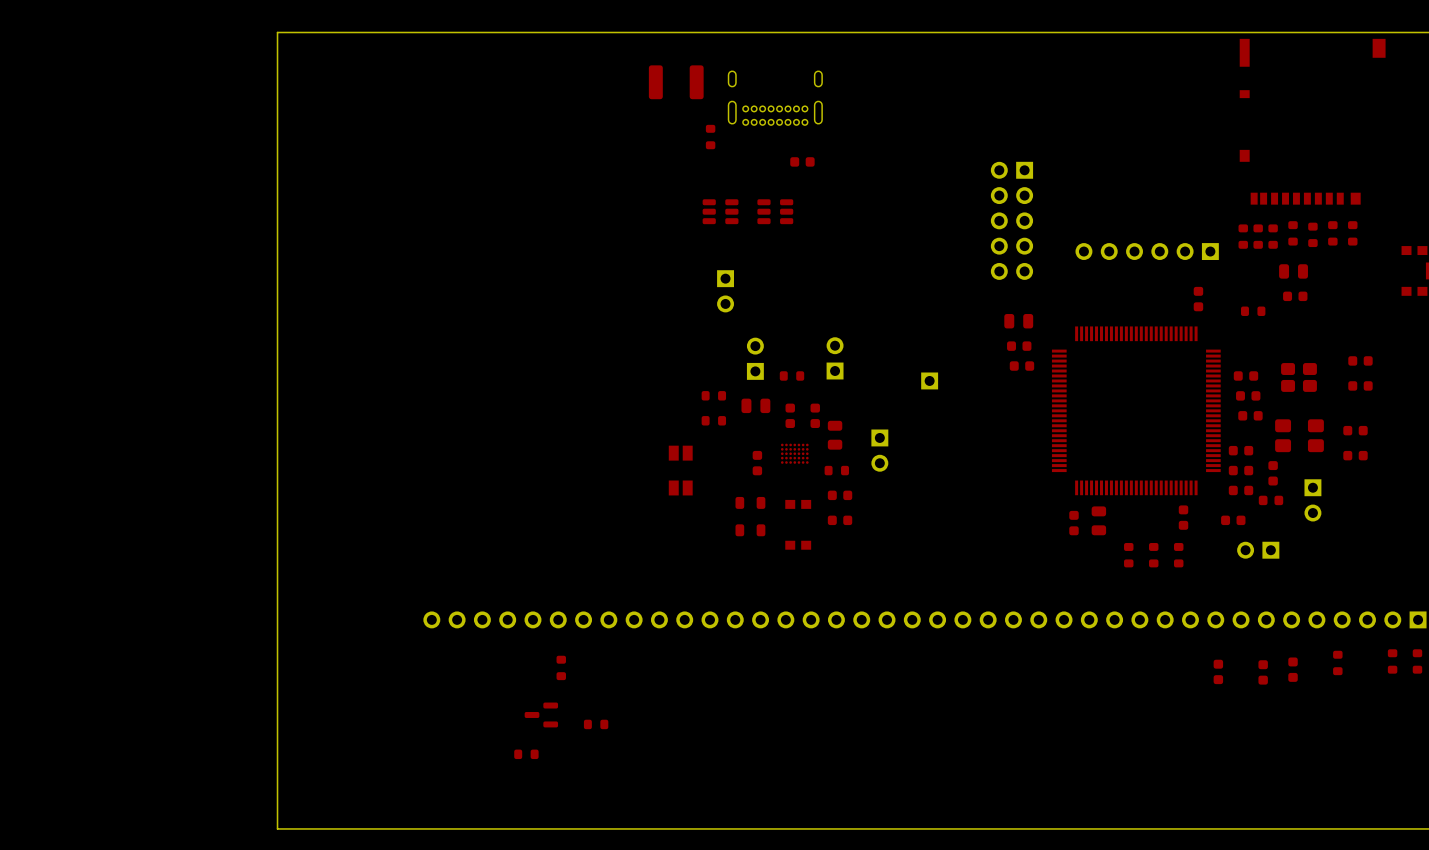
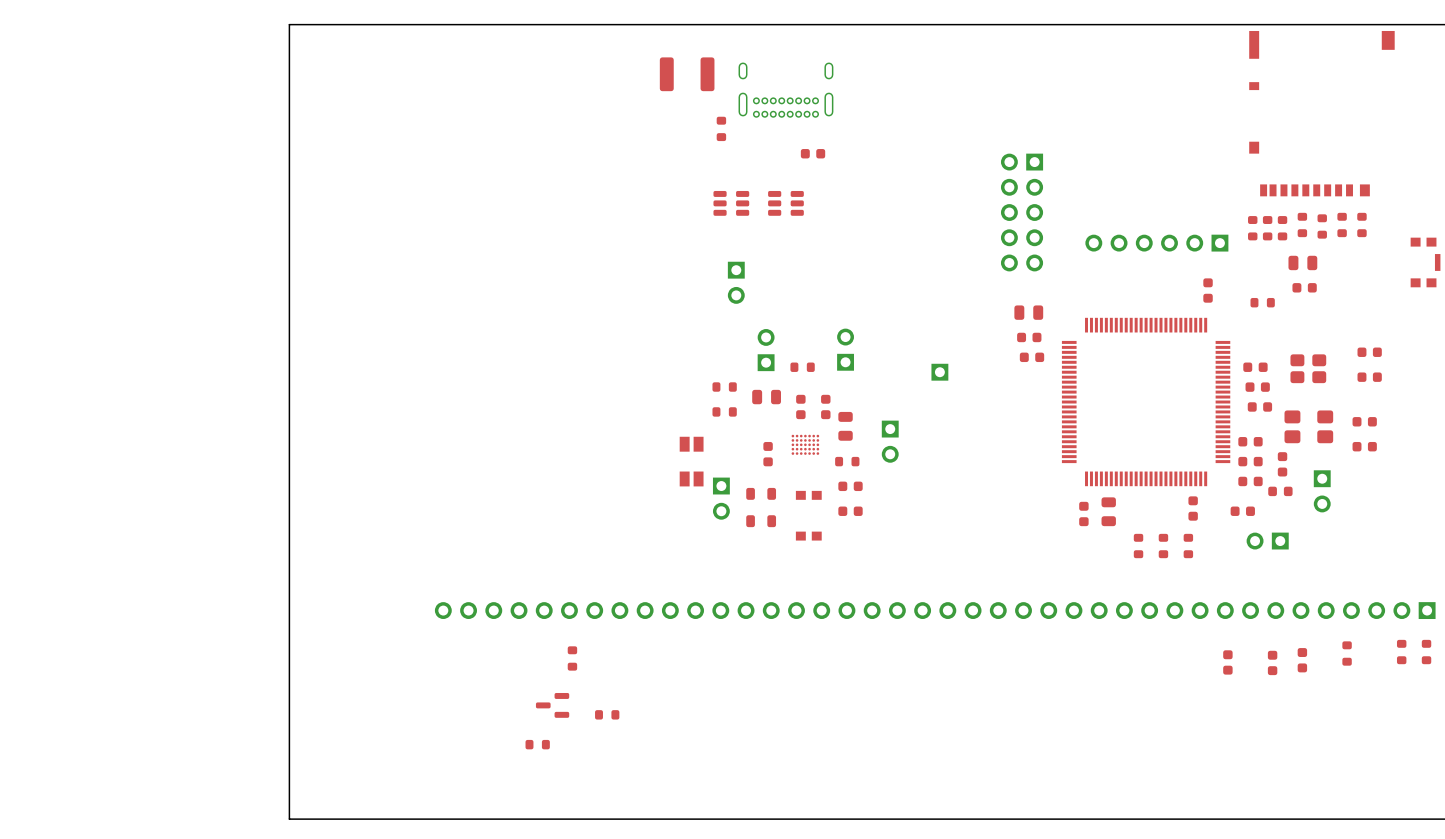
part: none -> (721, 498)

